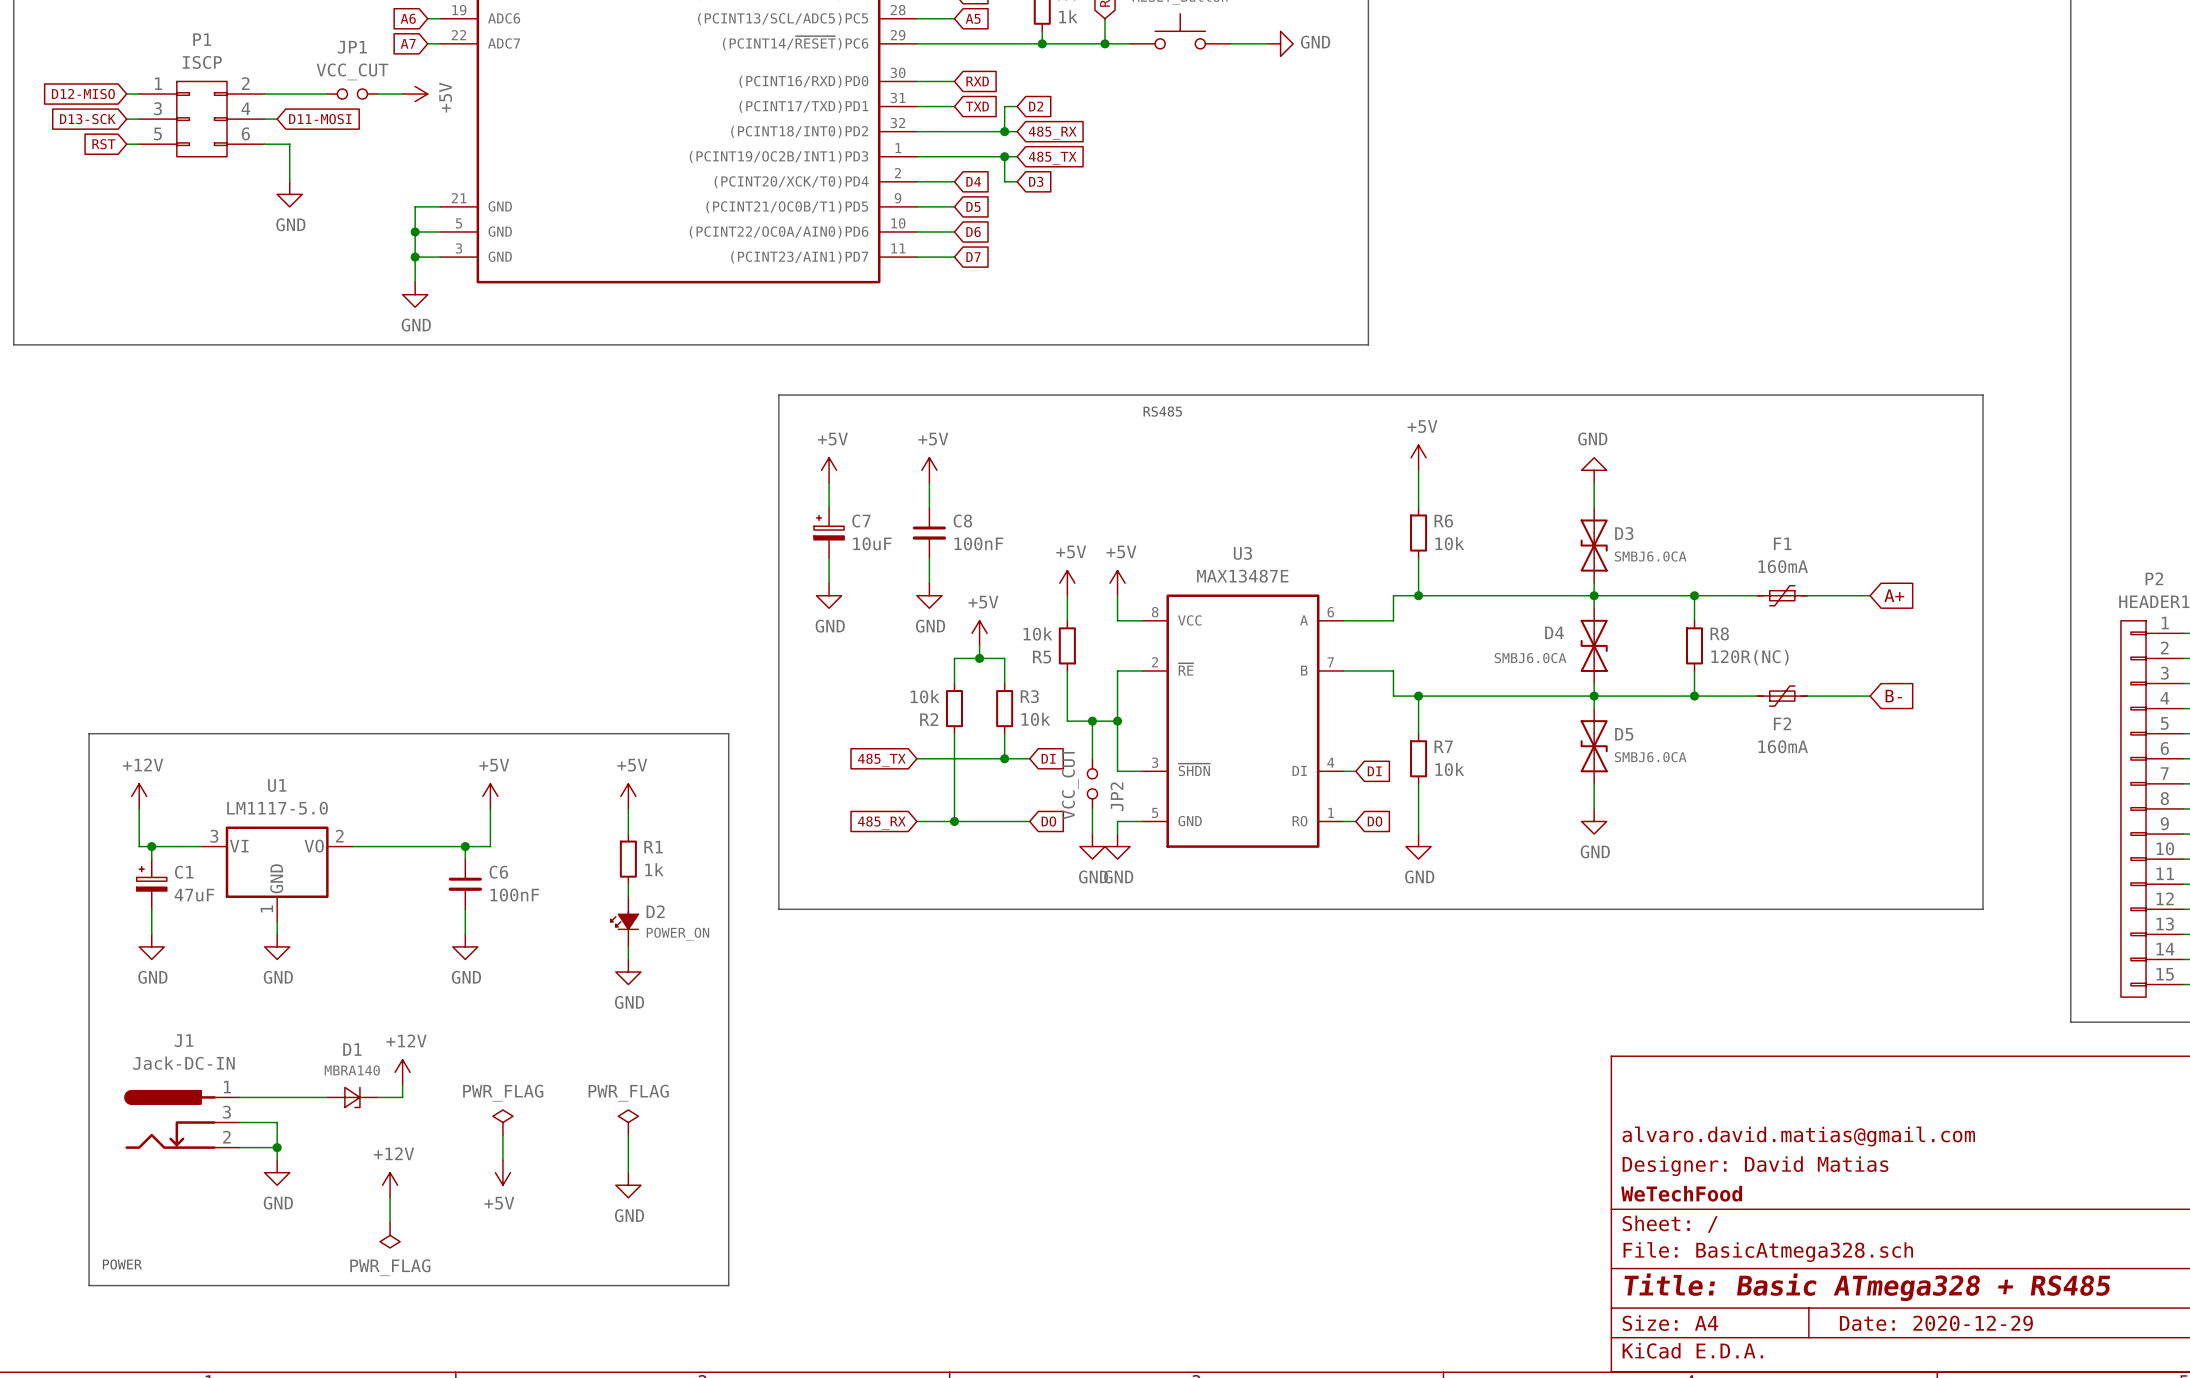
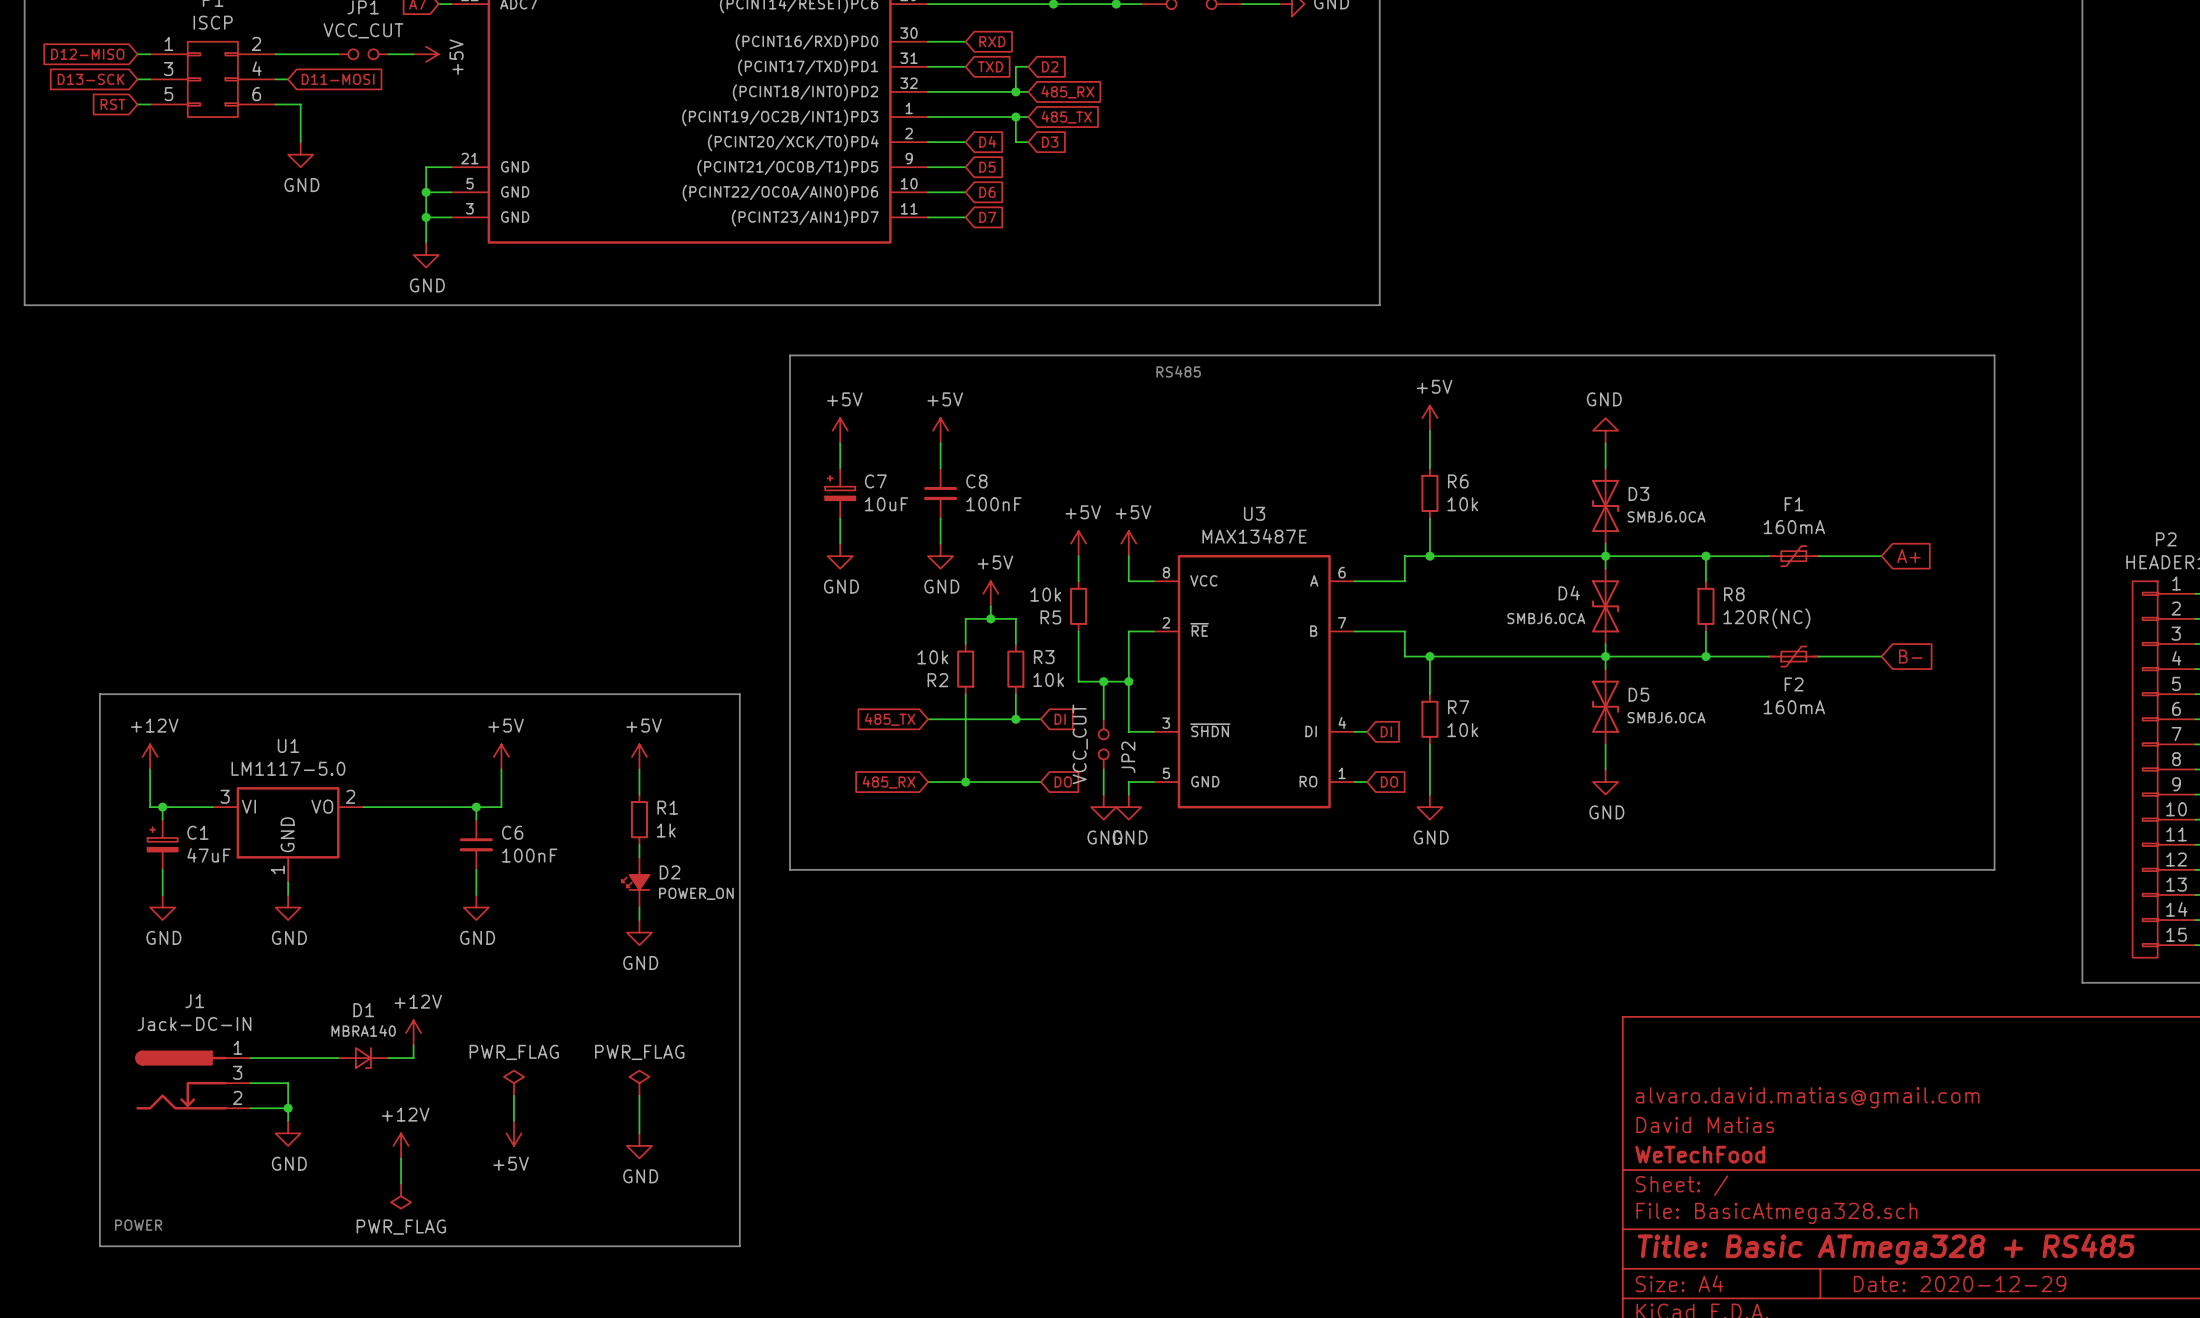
title block: Designer: David Matias (1755, 1166) -> David Matias (1705, 1124)

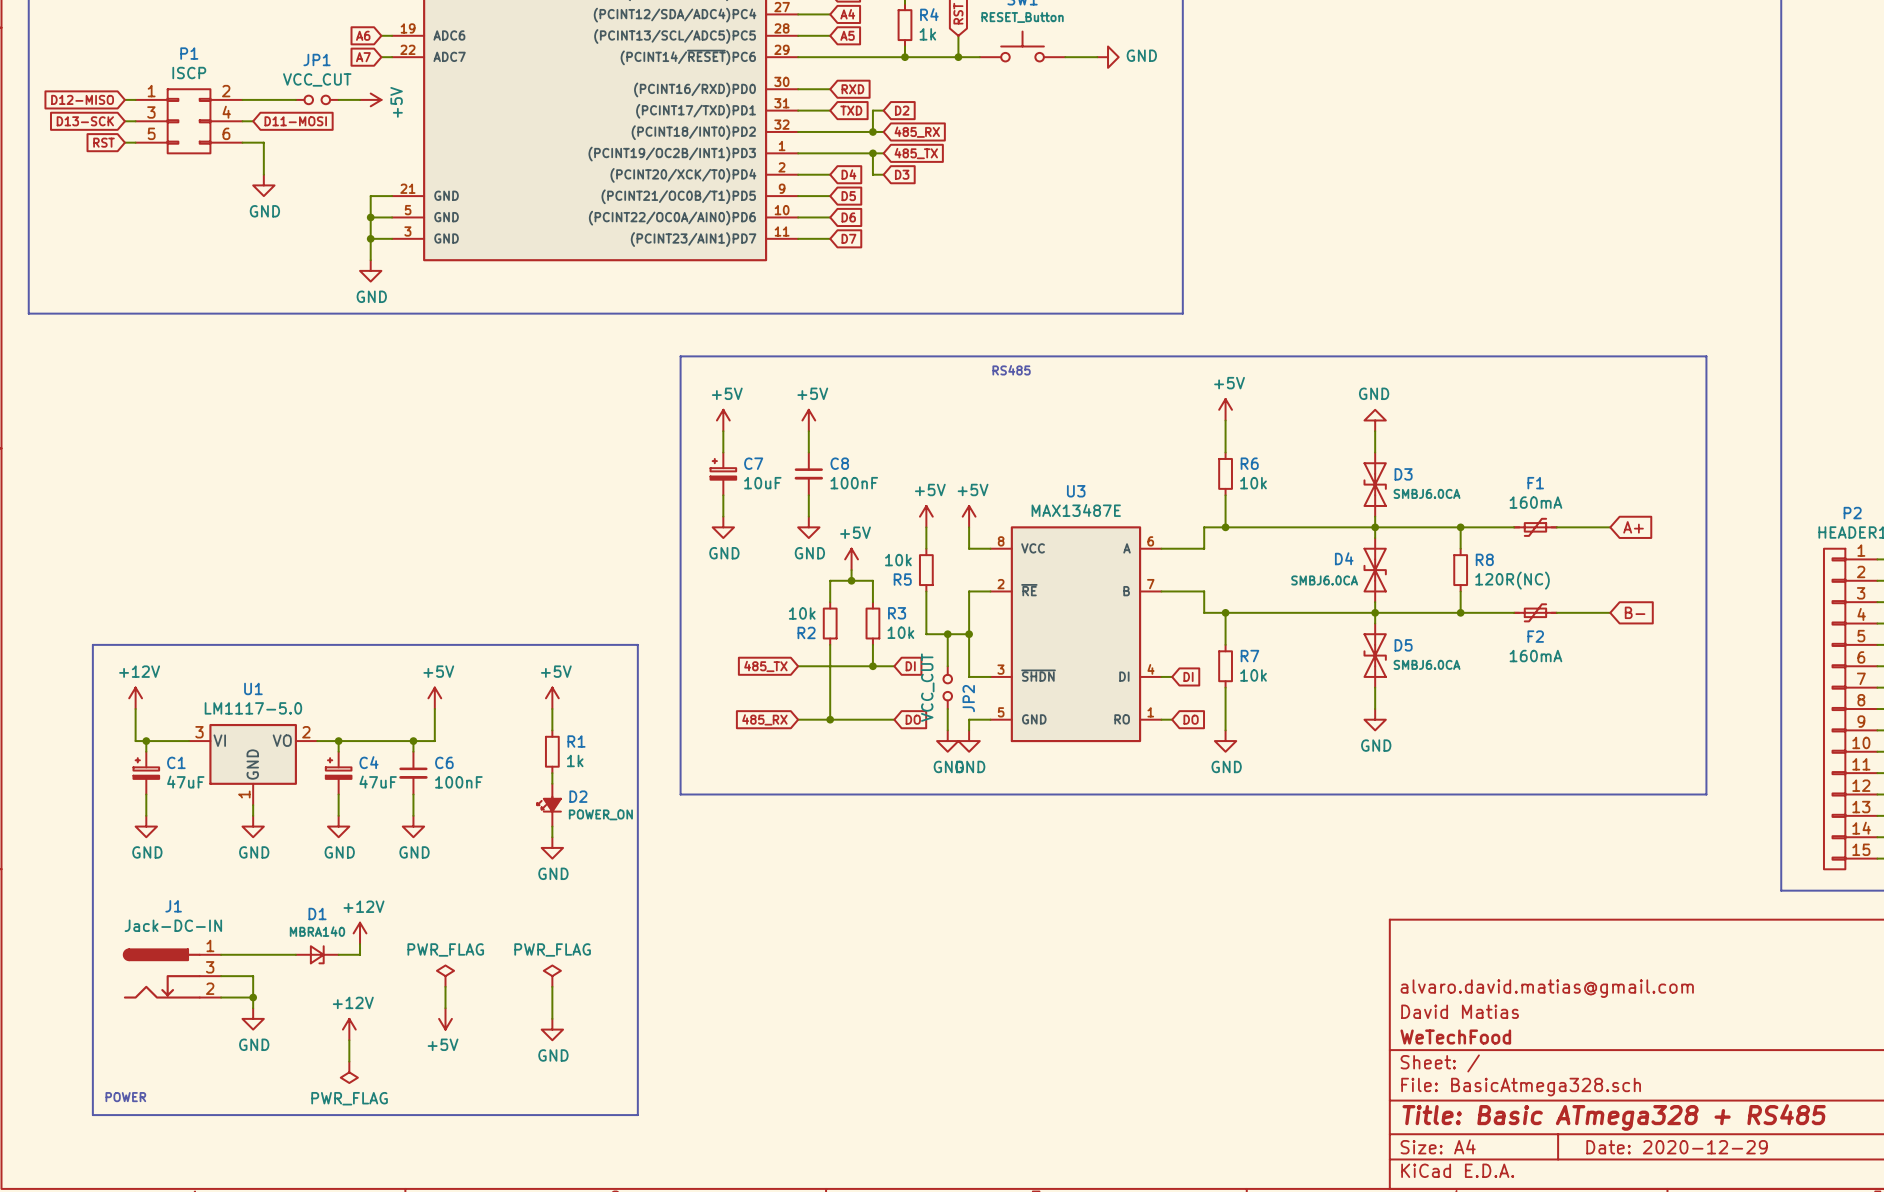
wire: none -> (338, 741) (338, 751)
junction: none -> (338, 741)
C4: none -> 47uF (338, 773)
wire: none -> (338, 794) (338, 815)
power symbol: none -> GND (338, 826)

